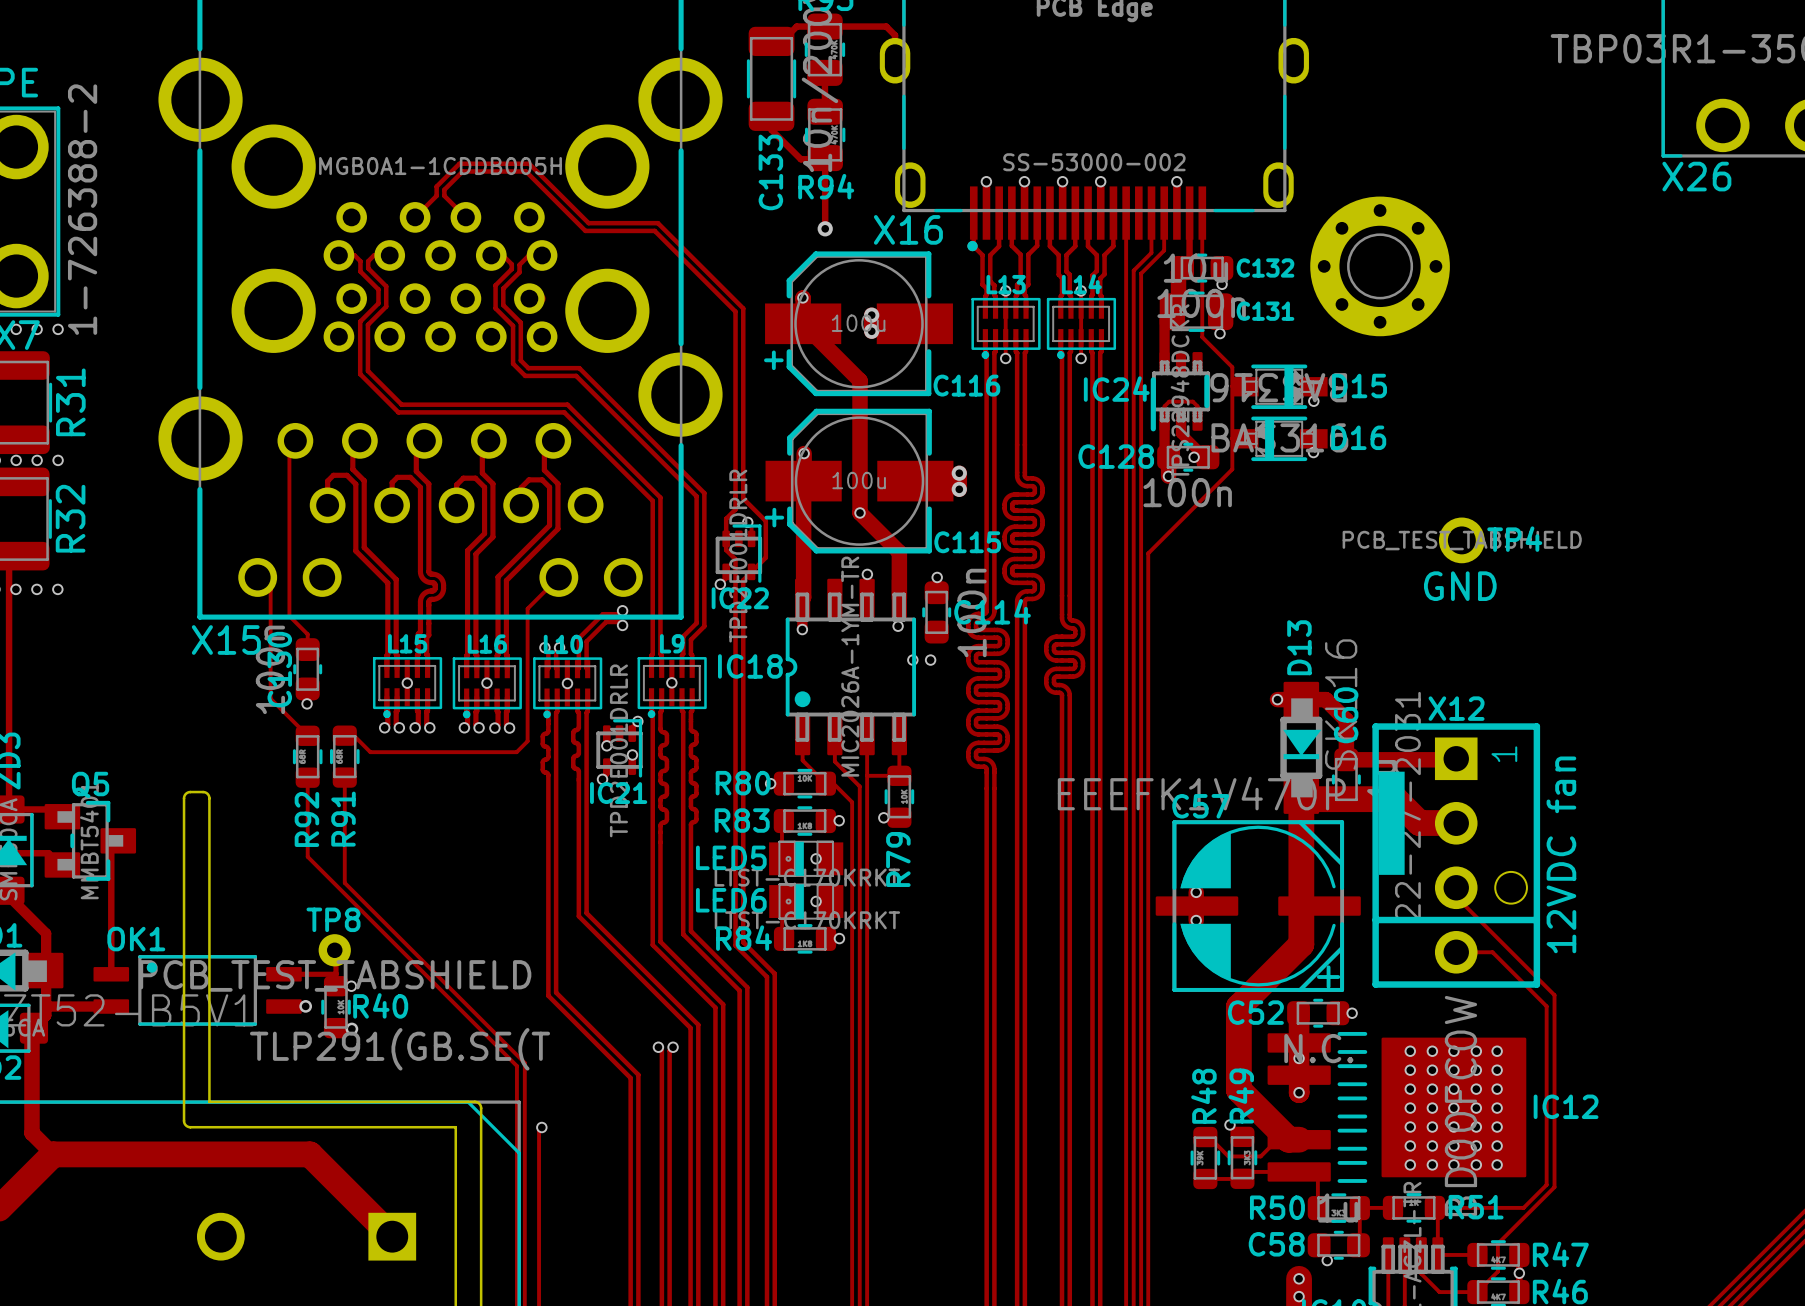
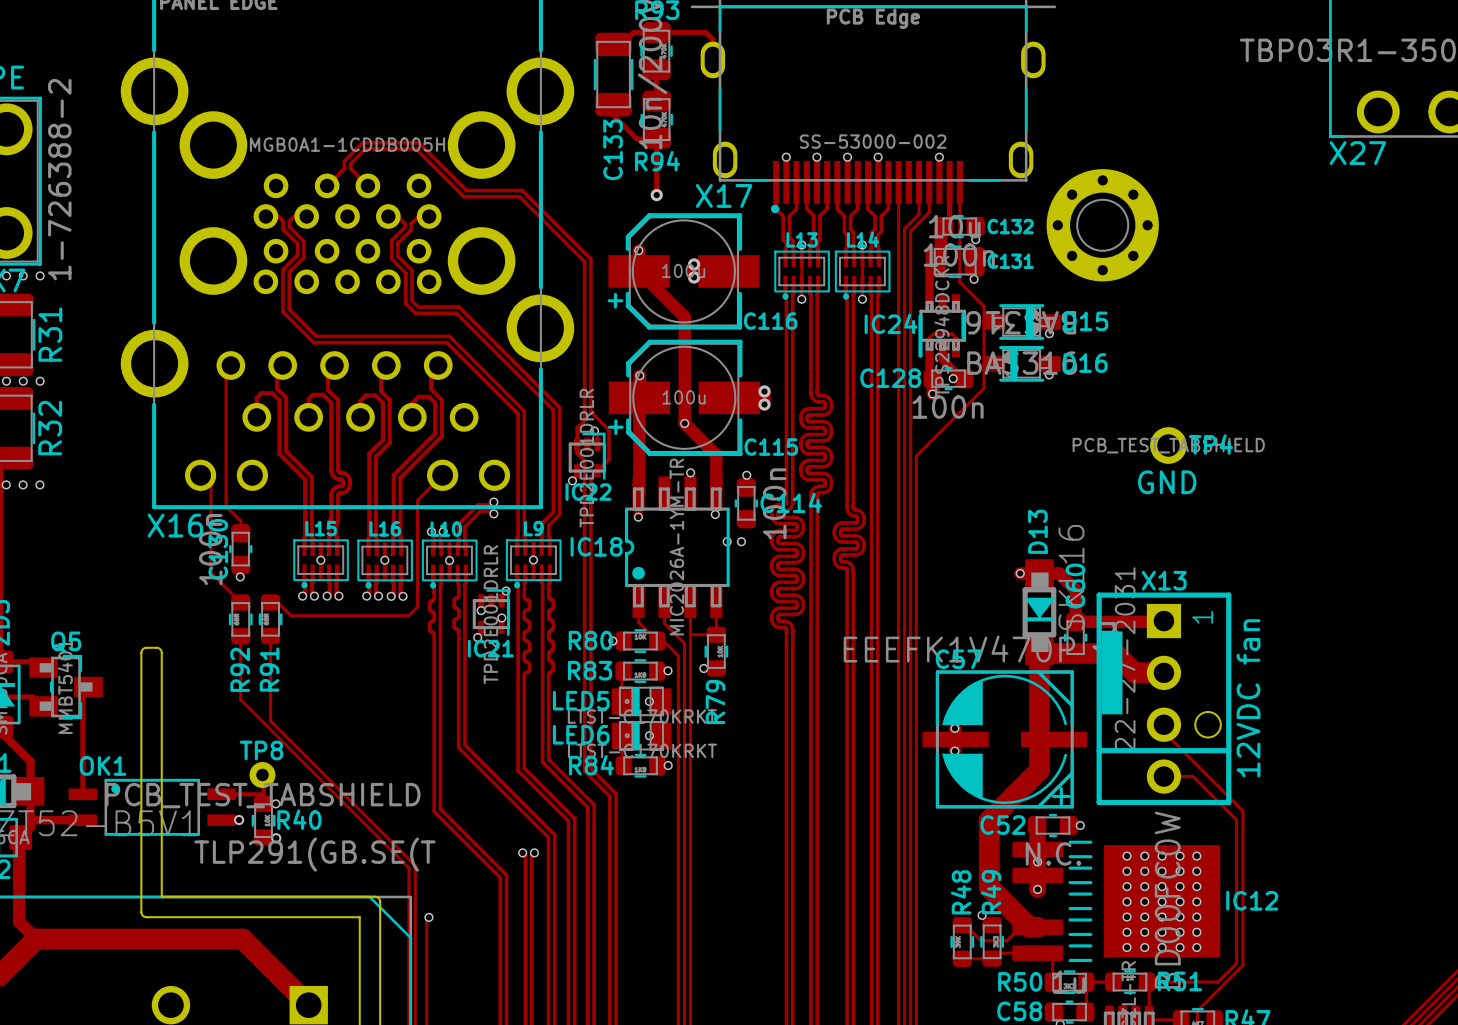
X26 name: X26 (1696, 176) -> X27 (1357, 153)
X16 name: X16 (908, 229) -> X17 (724, 195)
X15 name: X15 (226, 639) -> X16 (175, 525)
X12 name: X12 (1456, 708) -> X13 (1164, 580)

